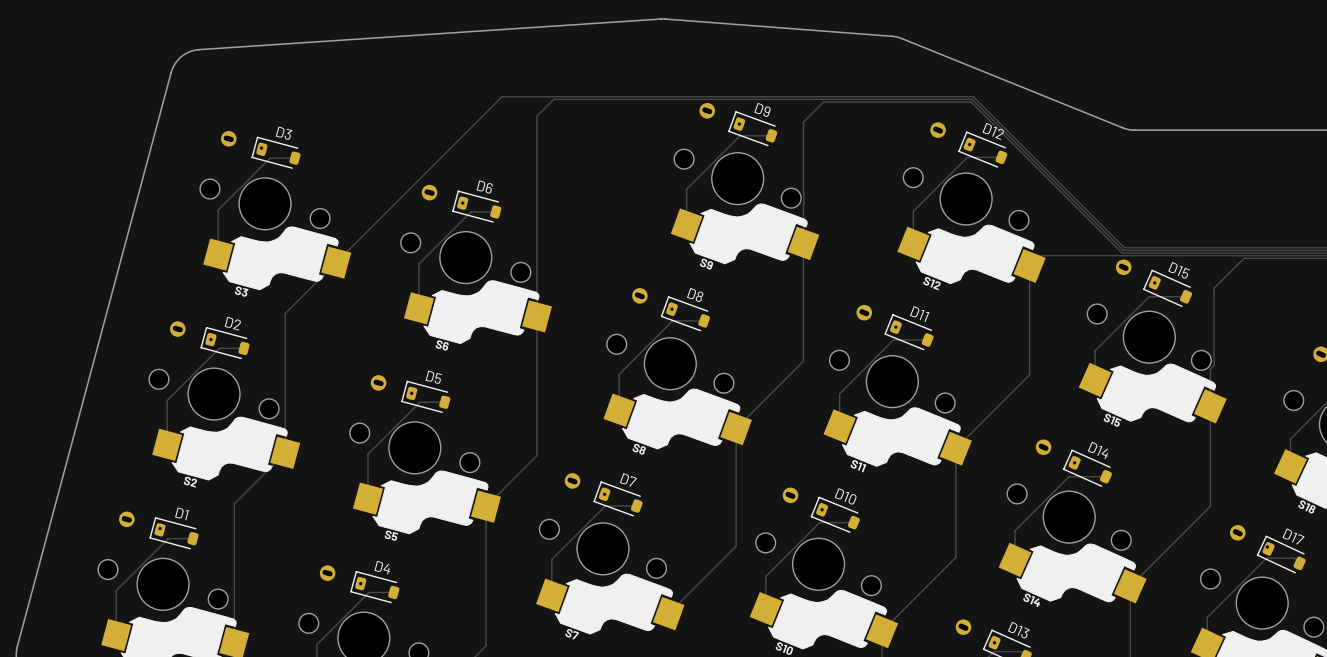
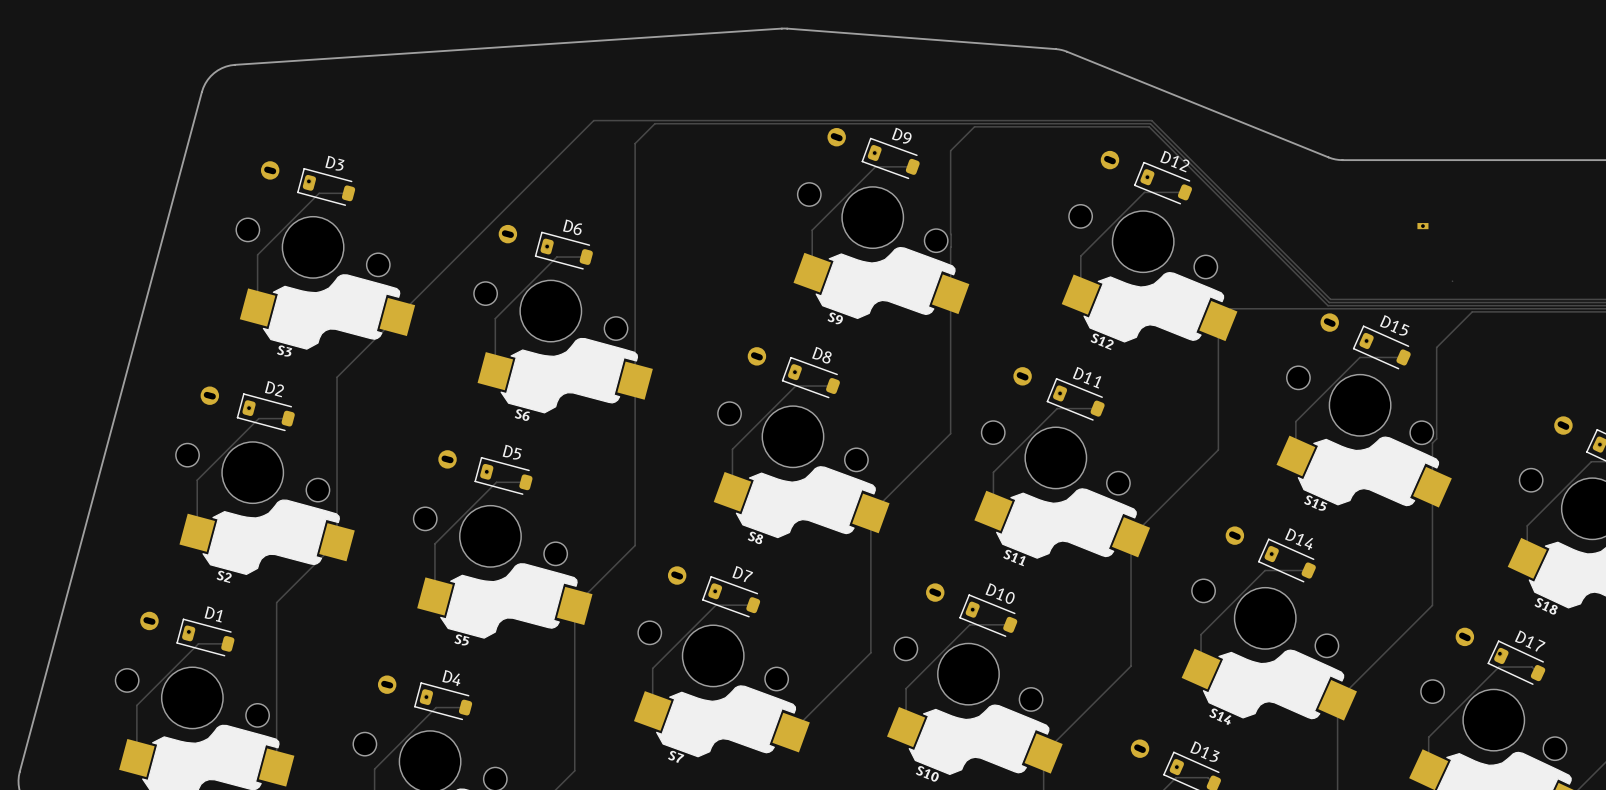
part: none -> (1422, 226)

